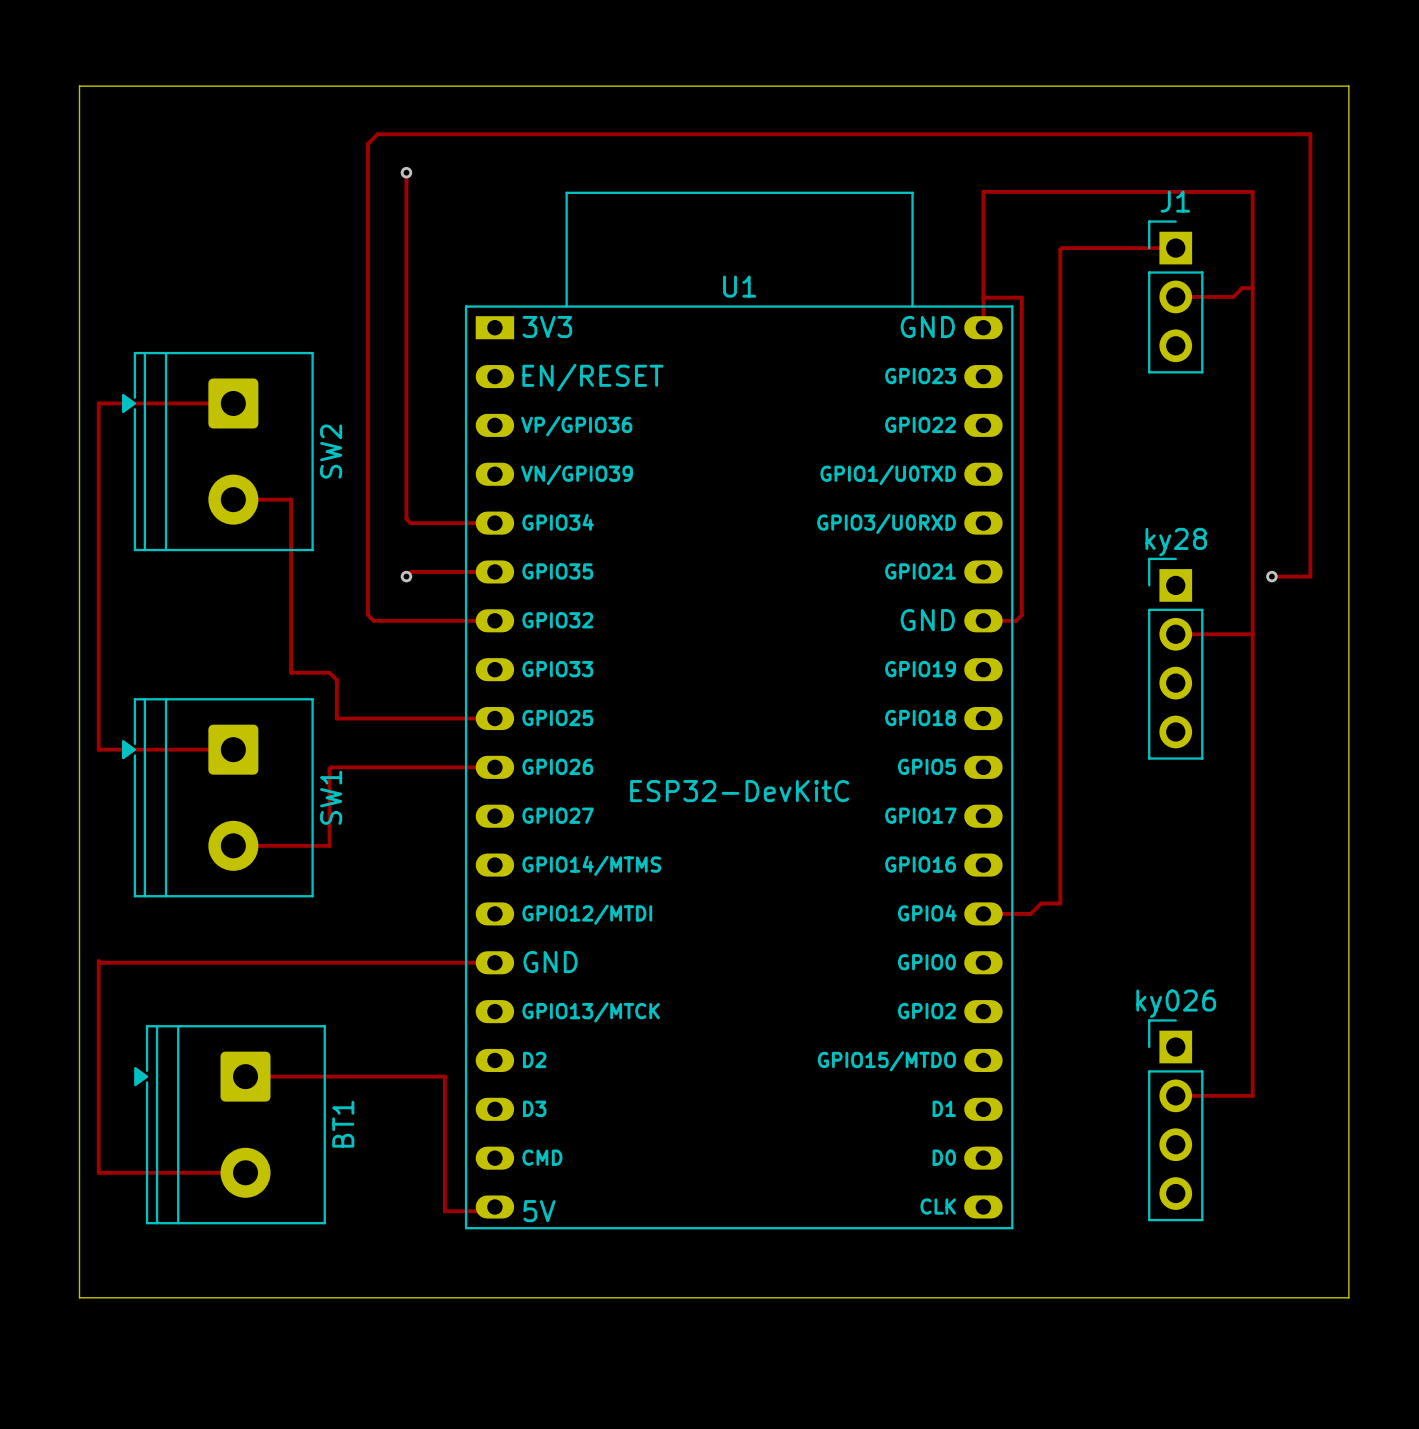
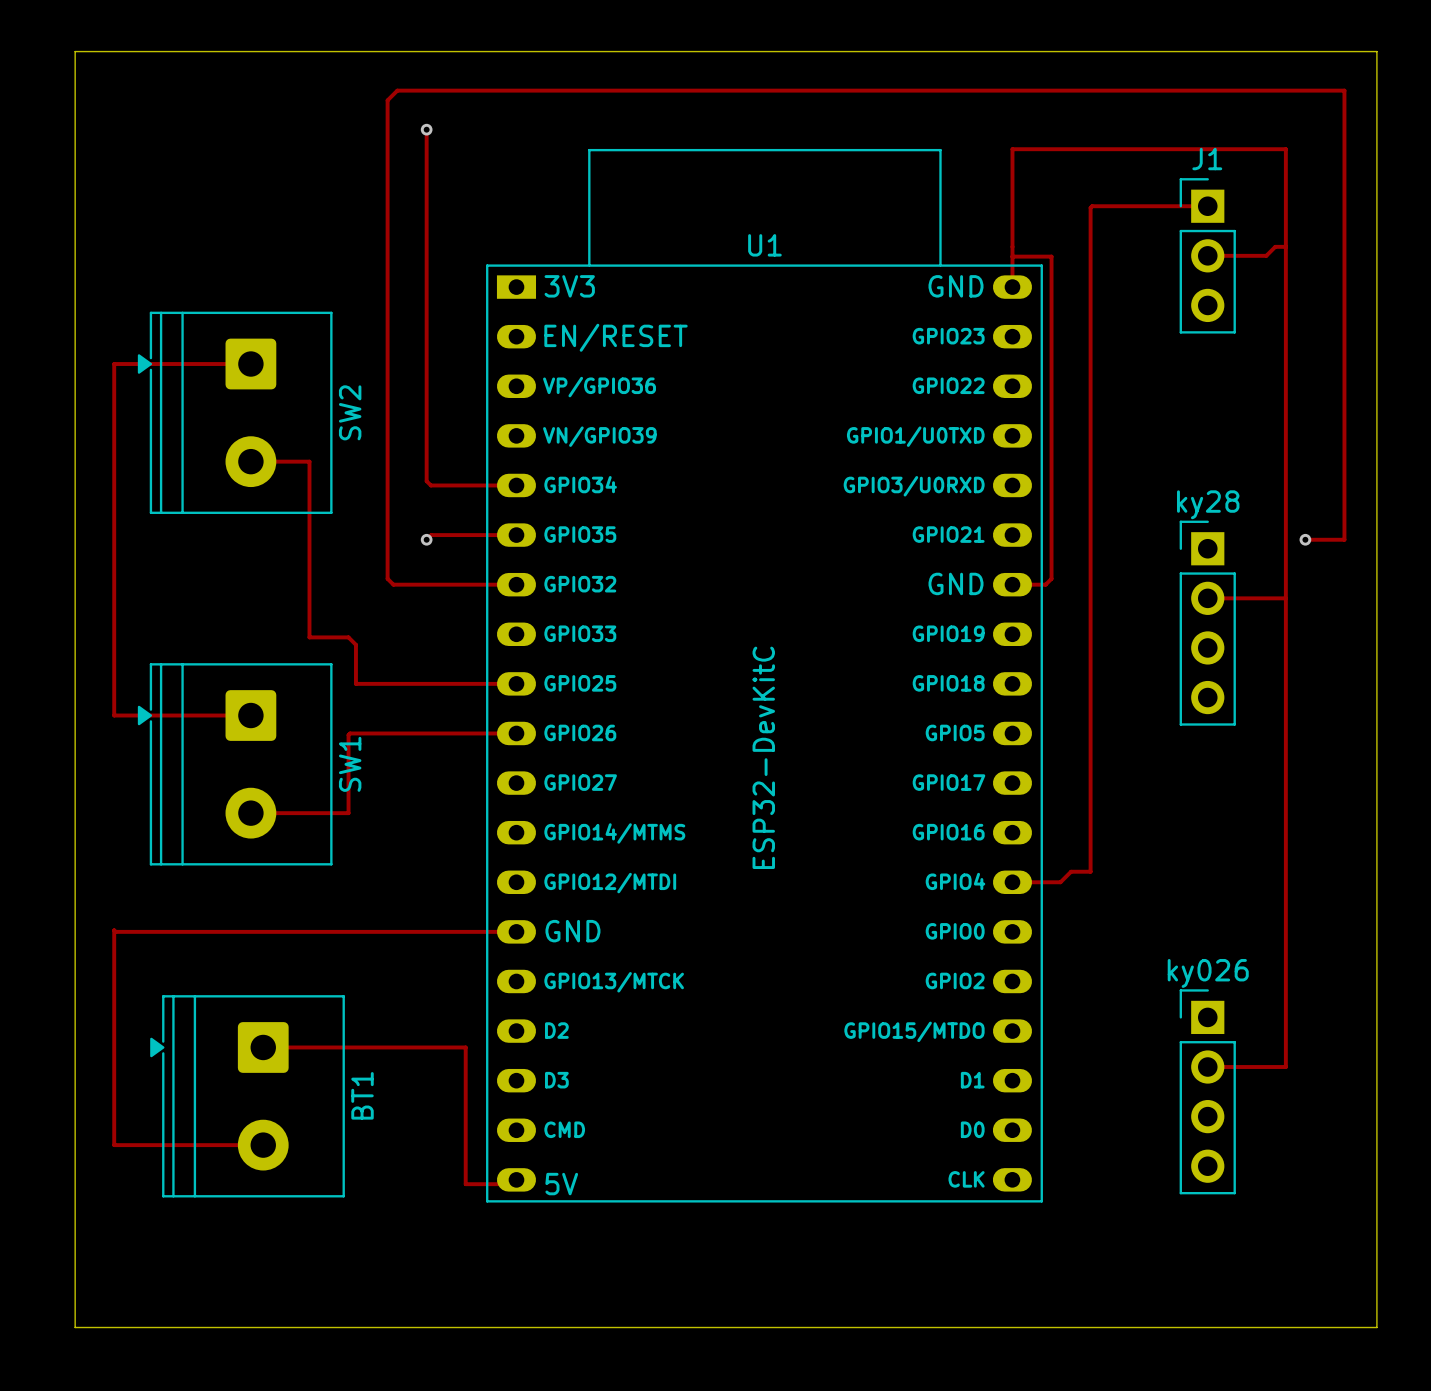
board edge: (79, 86) (1348, 86) (1348, 1297) (79, 1297) (79, 86) -> (75, 51) (75, 1327) (1376, 1327) (1376, 51) (75, 51)
U1 value rotation: 0° (739, 791) -> 90° counterclockwise (763, 757)

